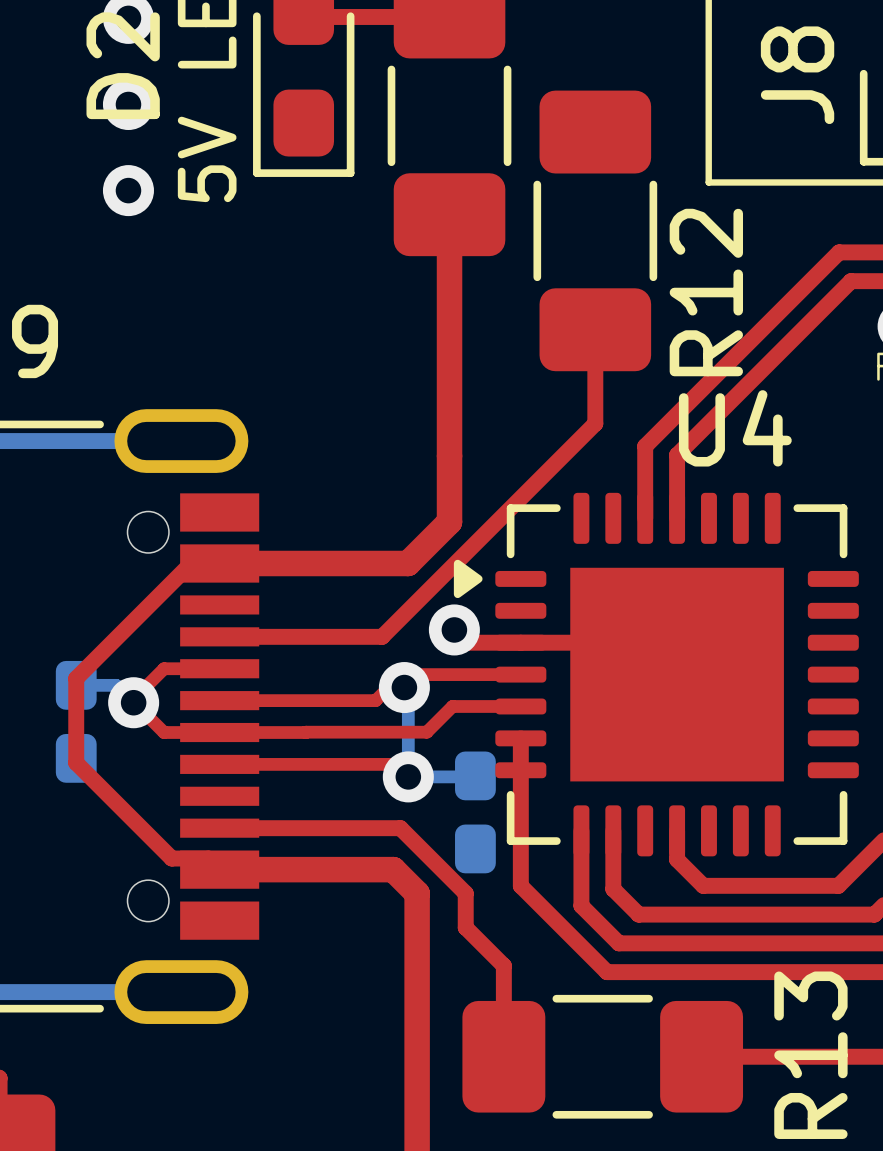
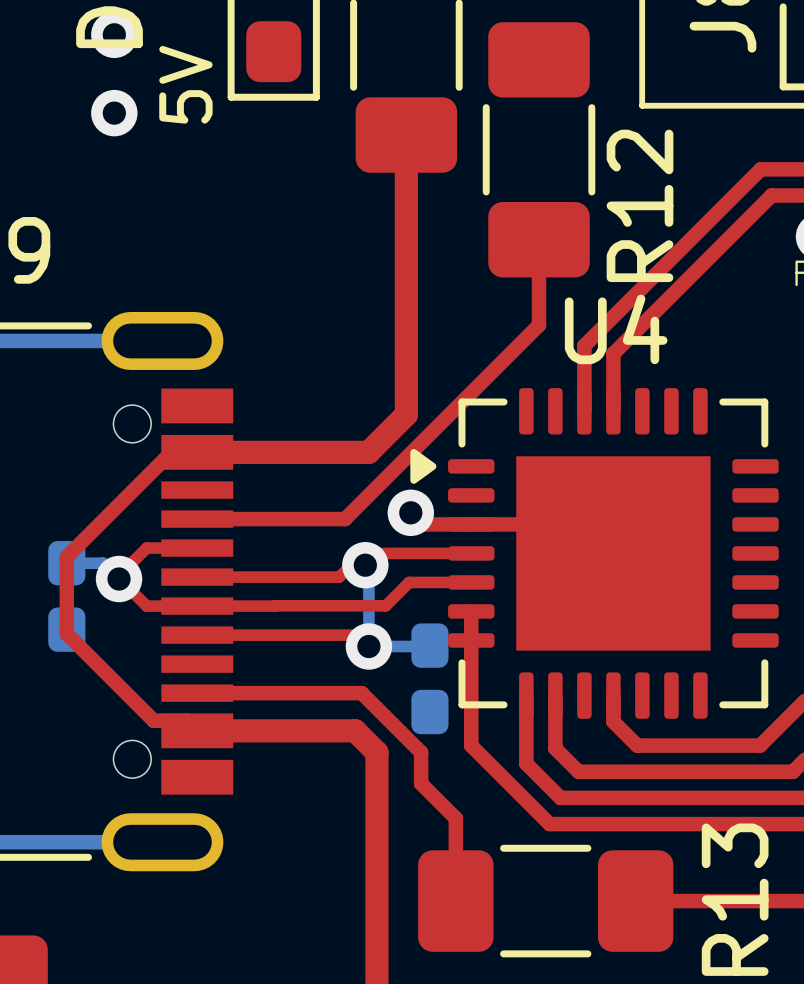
U4 name position: U4 (735, 428) -> U4 (616, 329)

